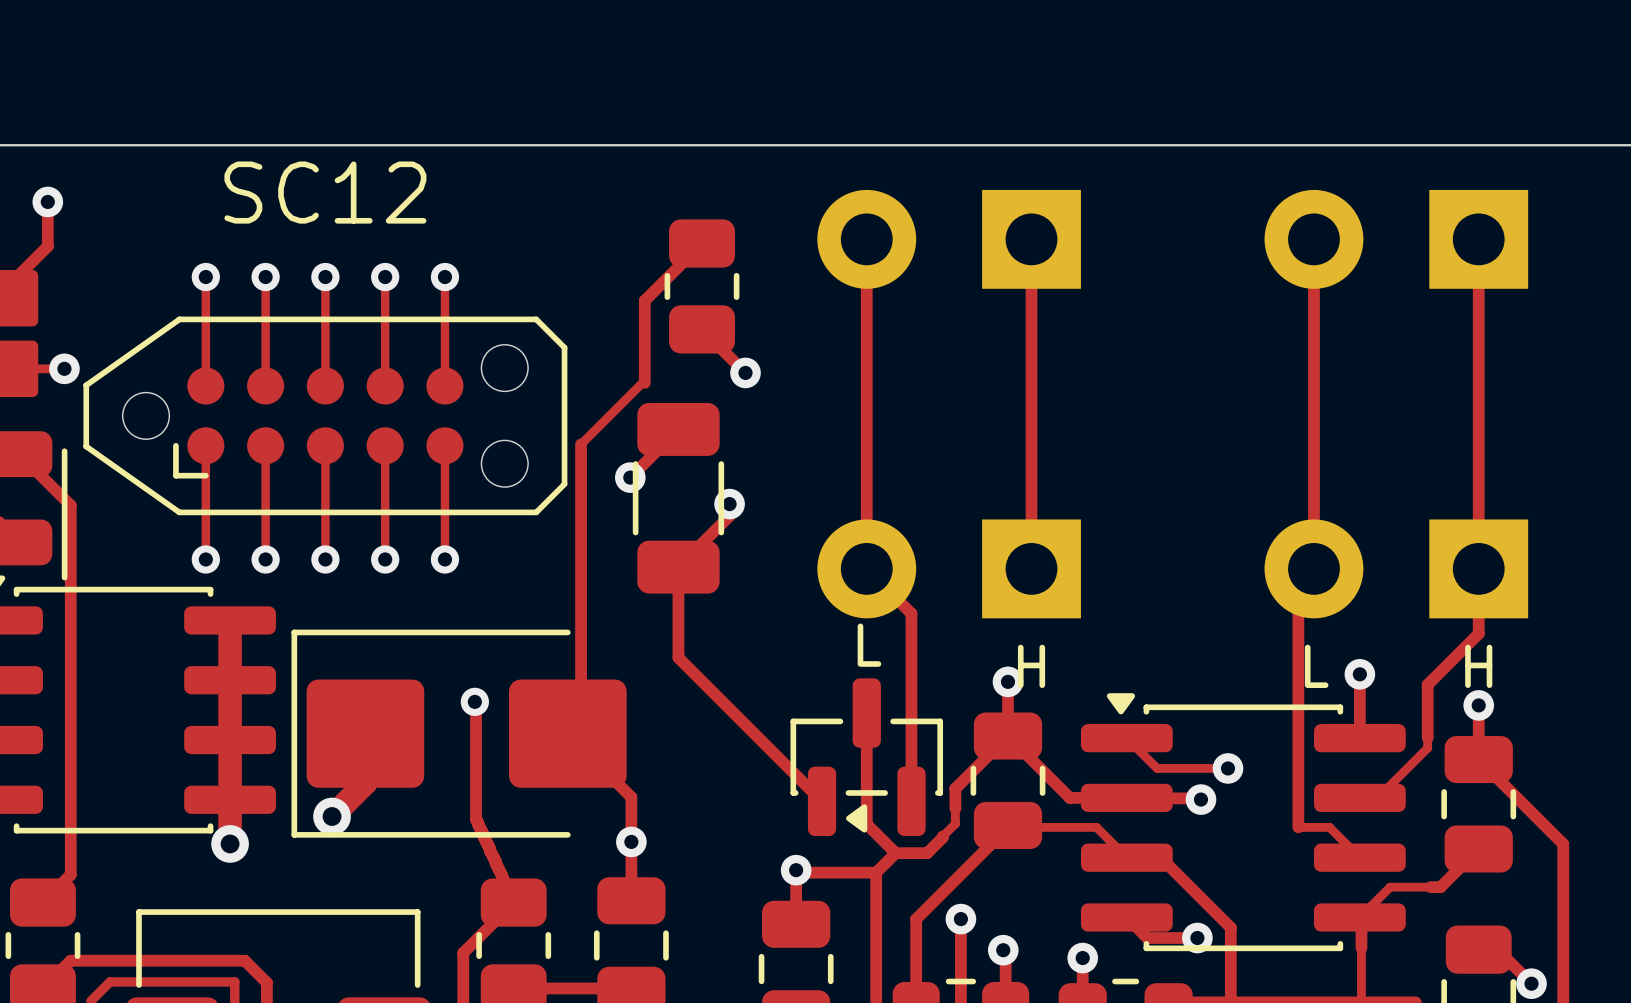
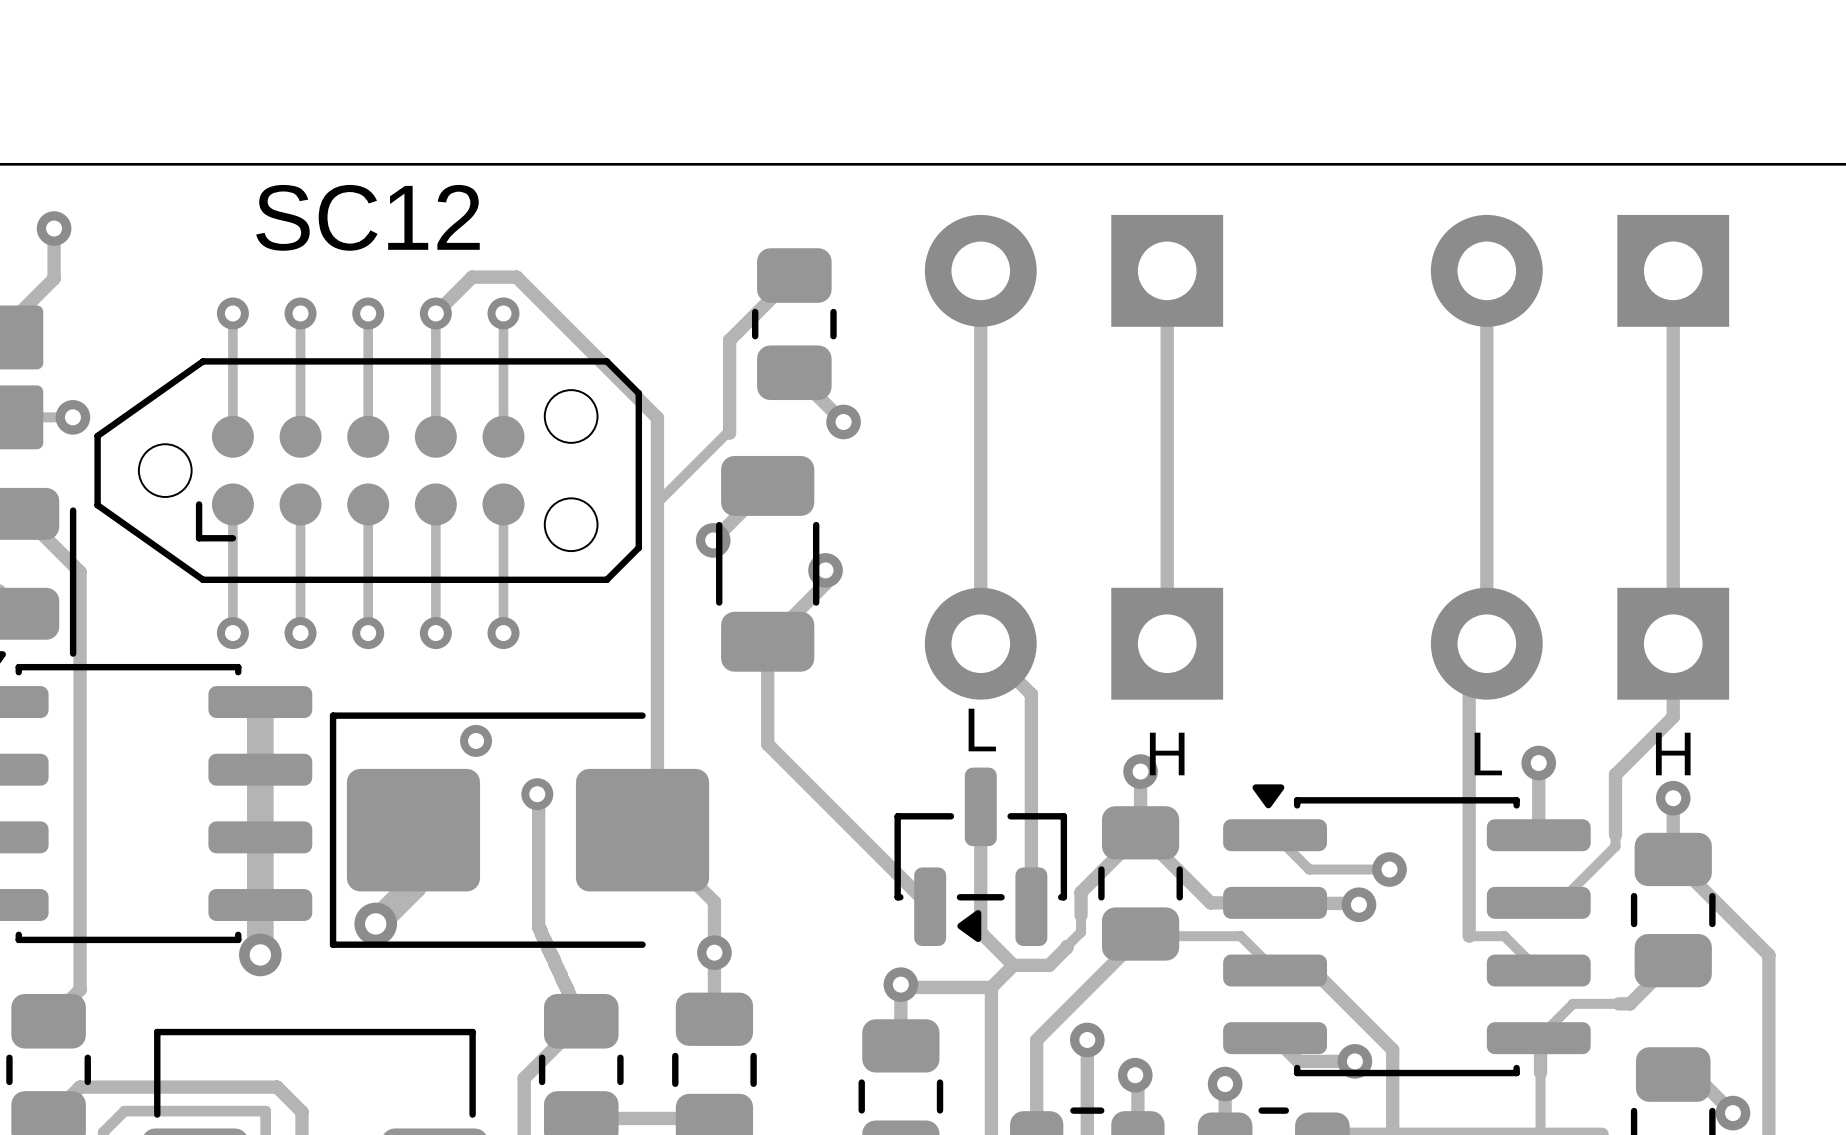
track: none -> (435, 313) (472, 277) (516, 277) (657, 417) (657, 502)
via: none -> (476, 740)

